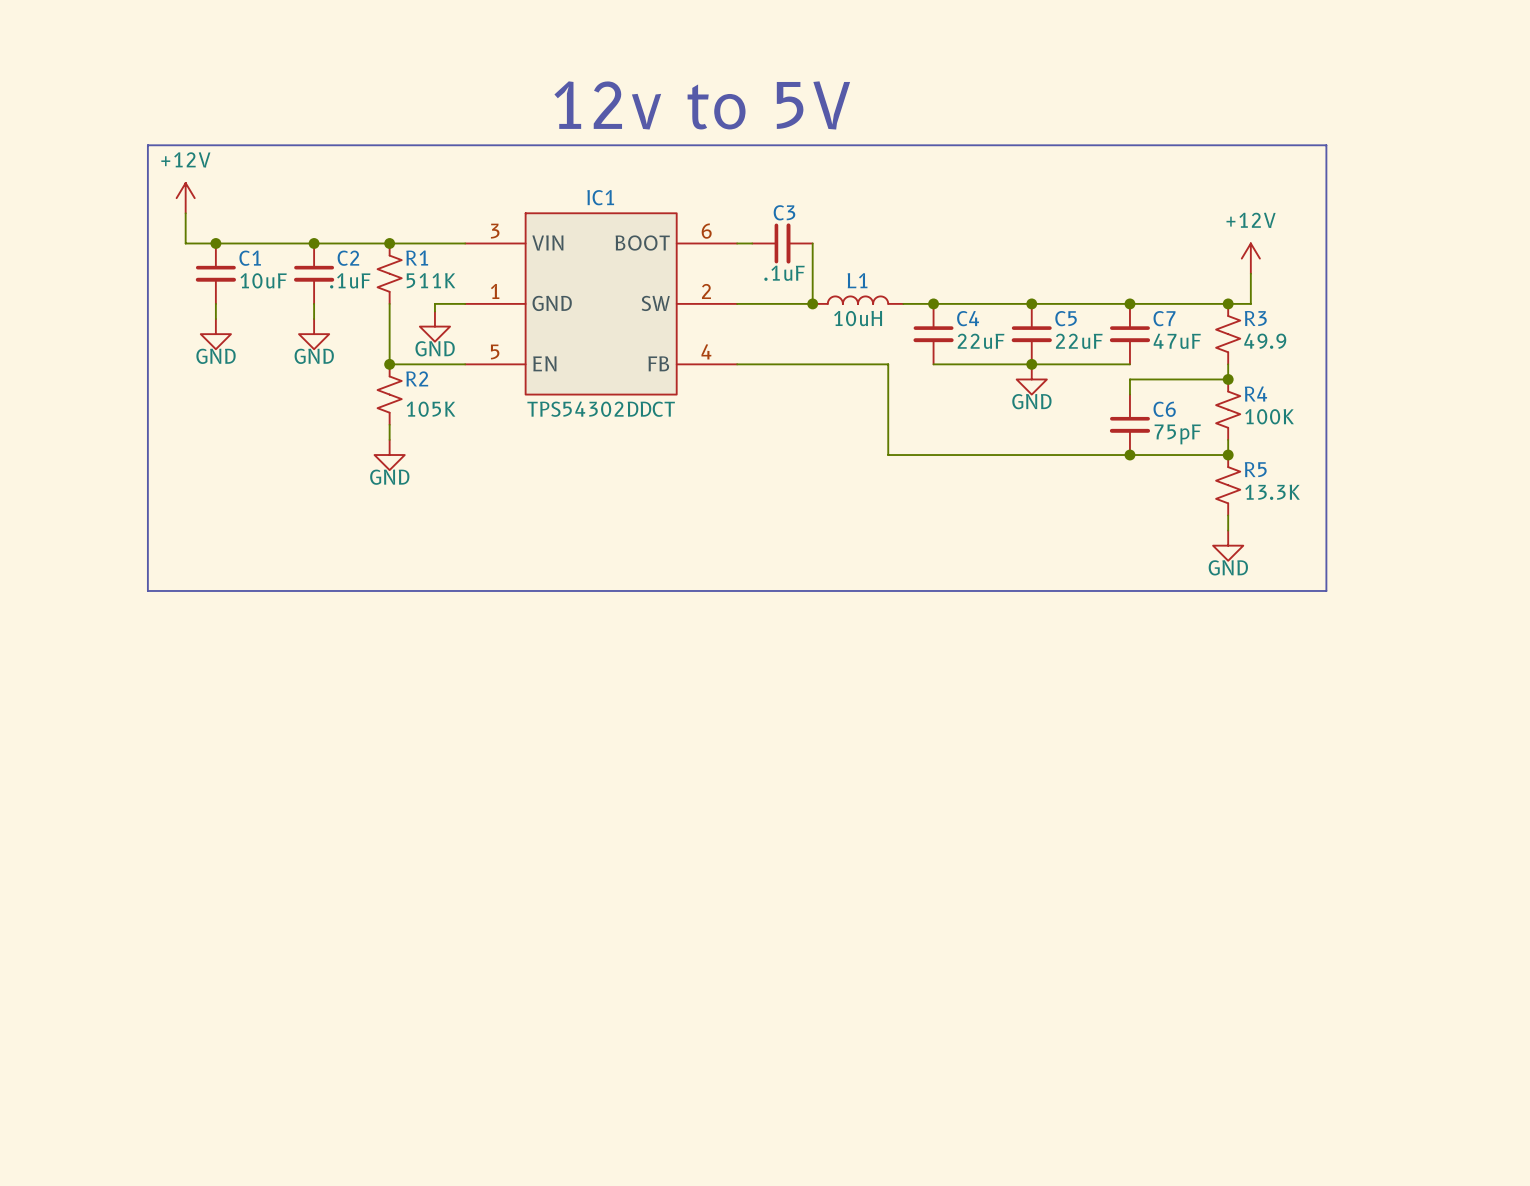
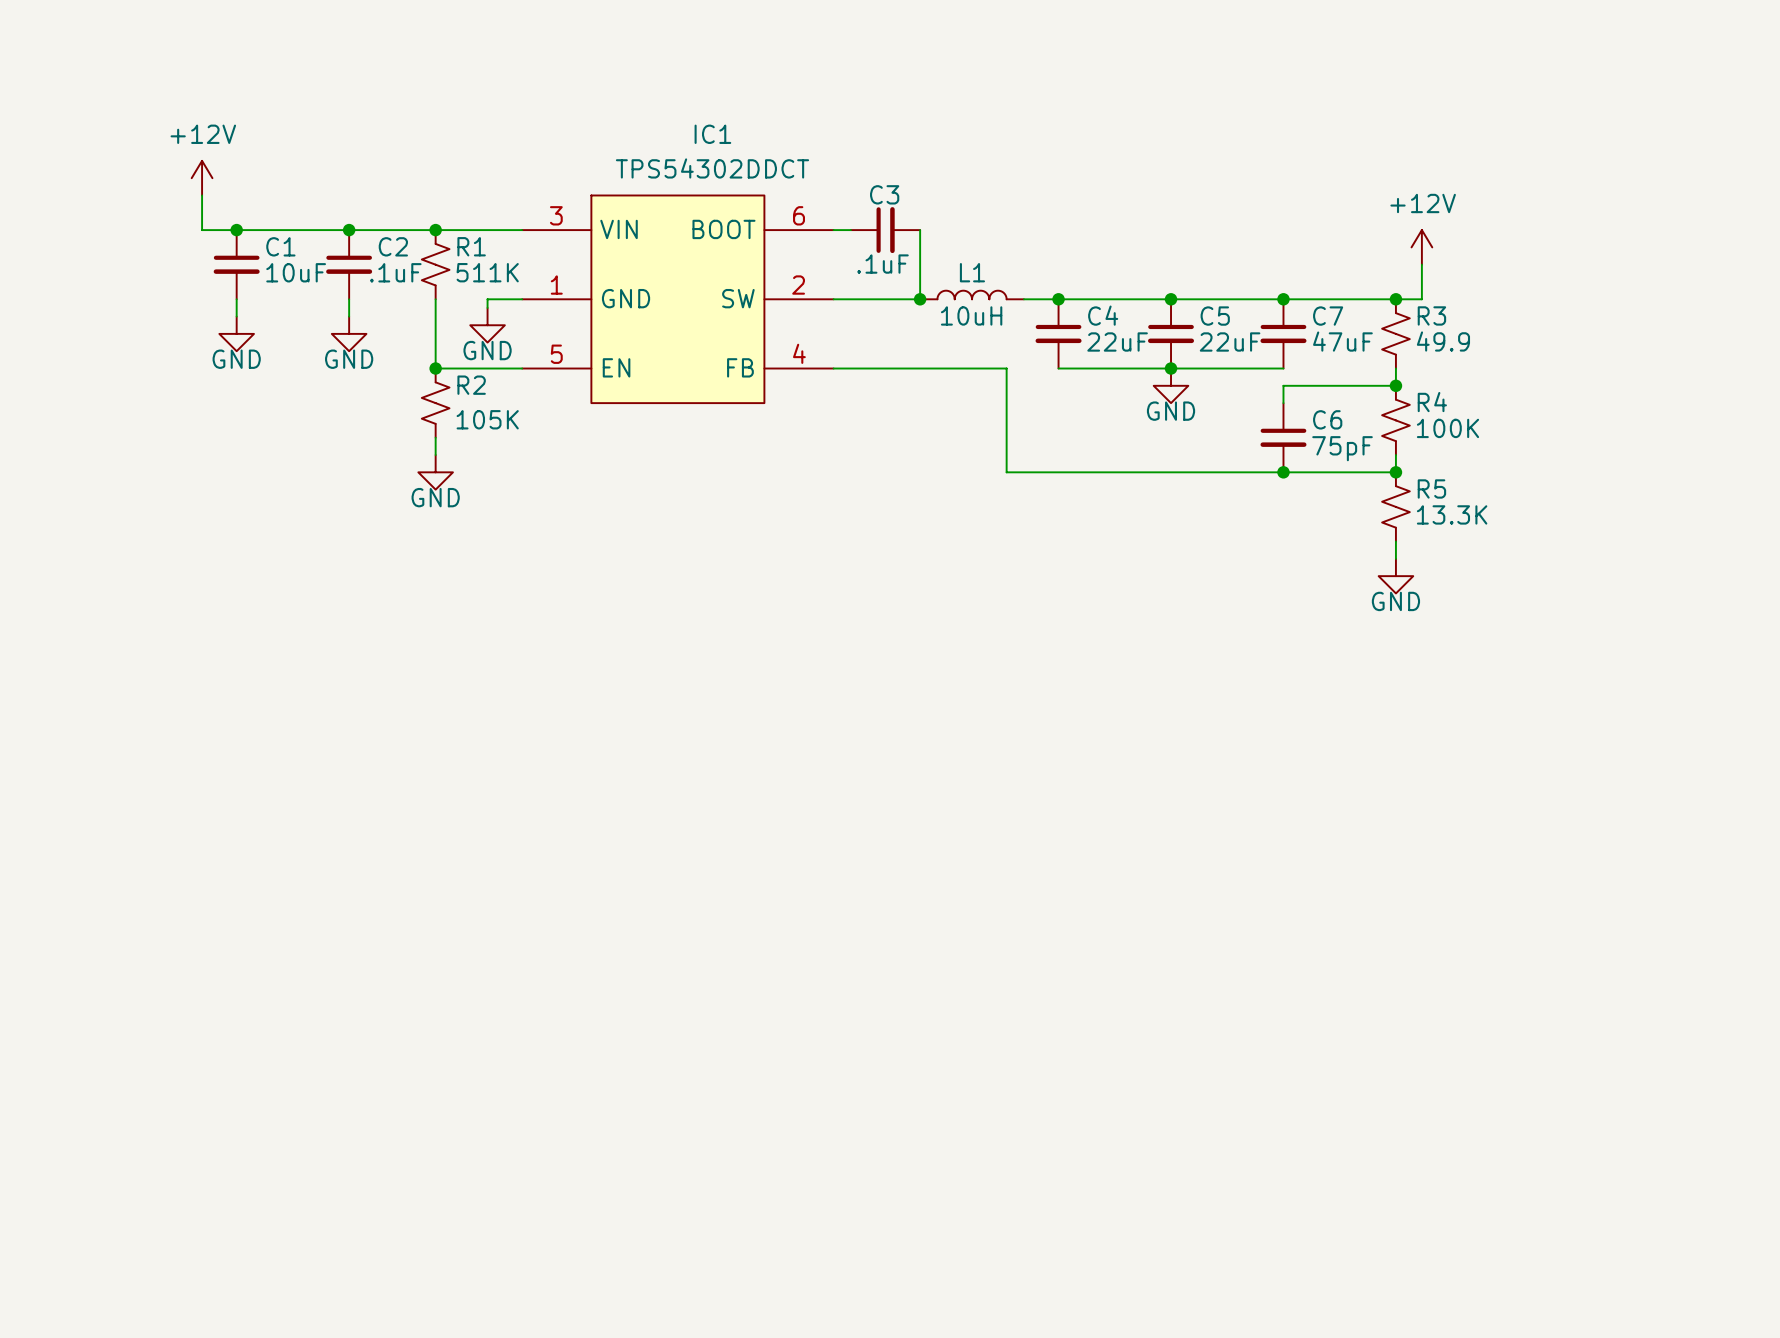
text: 12v to 5V (702, 105) -> none
line: (147, 145) (1326, 145) (1326, 590) (147, 590) (147, 145) -> none
IC1 name position: IC1 (600, 197) -> IC1 (712, 134)
IC1 value position: TPS54302DDCT (601, 409) -> TPS54302DDCT (712, 168)

